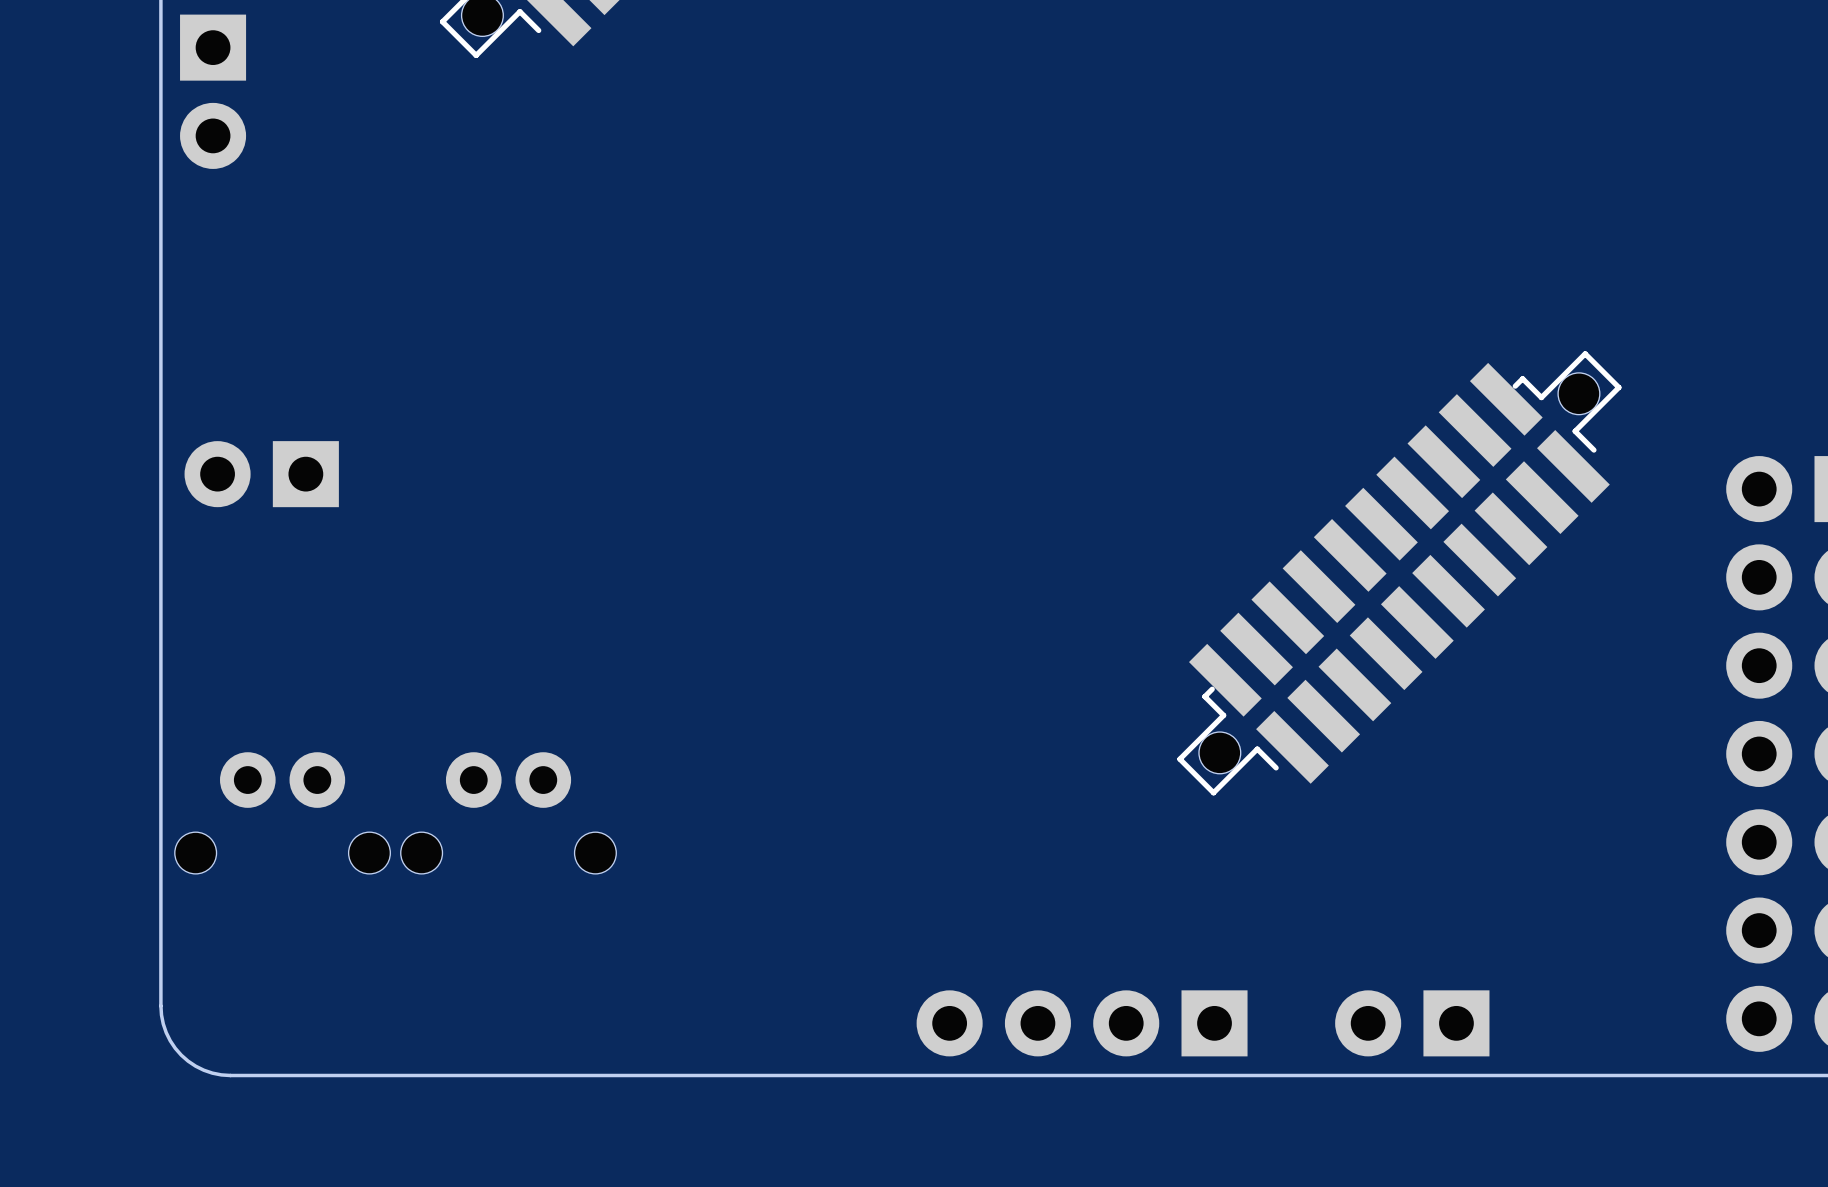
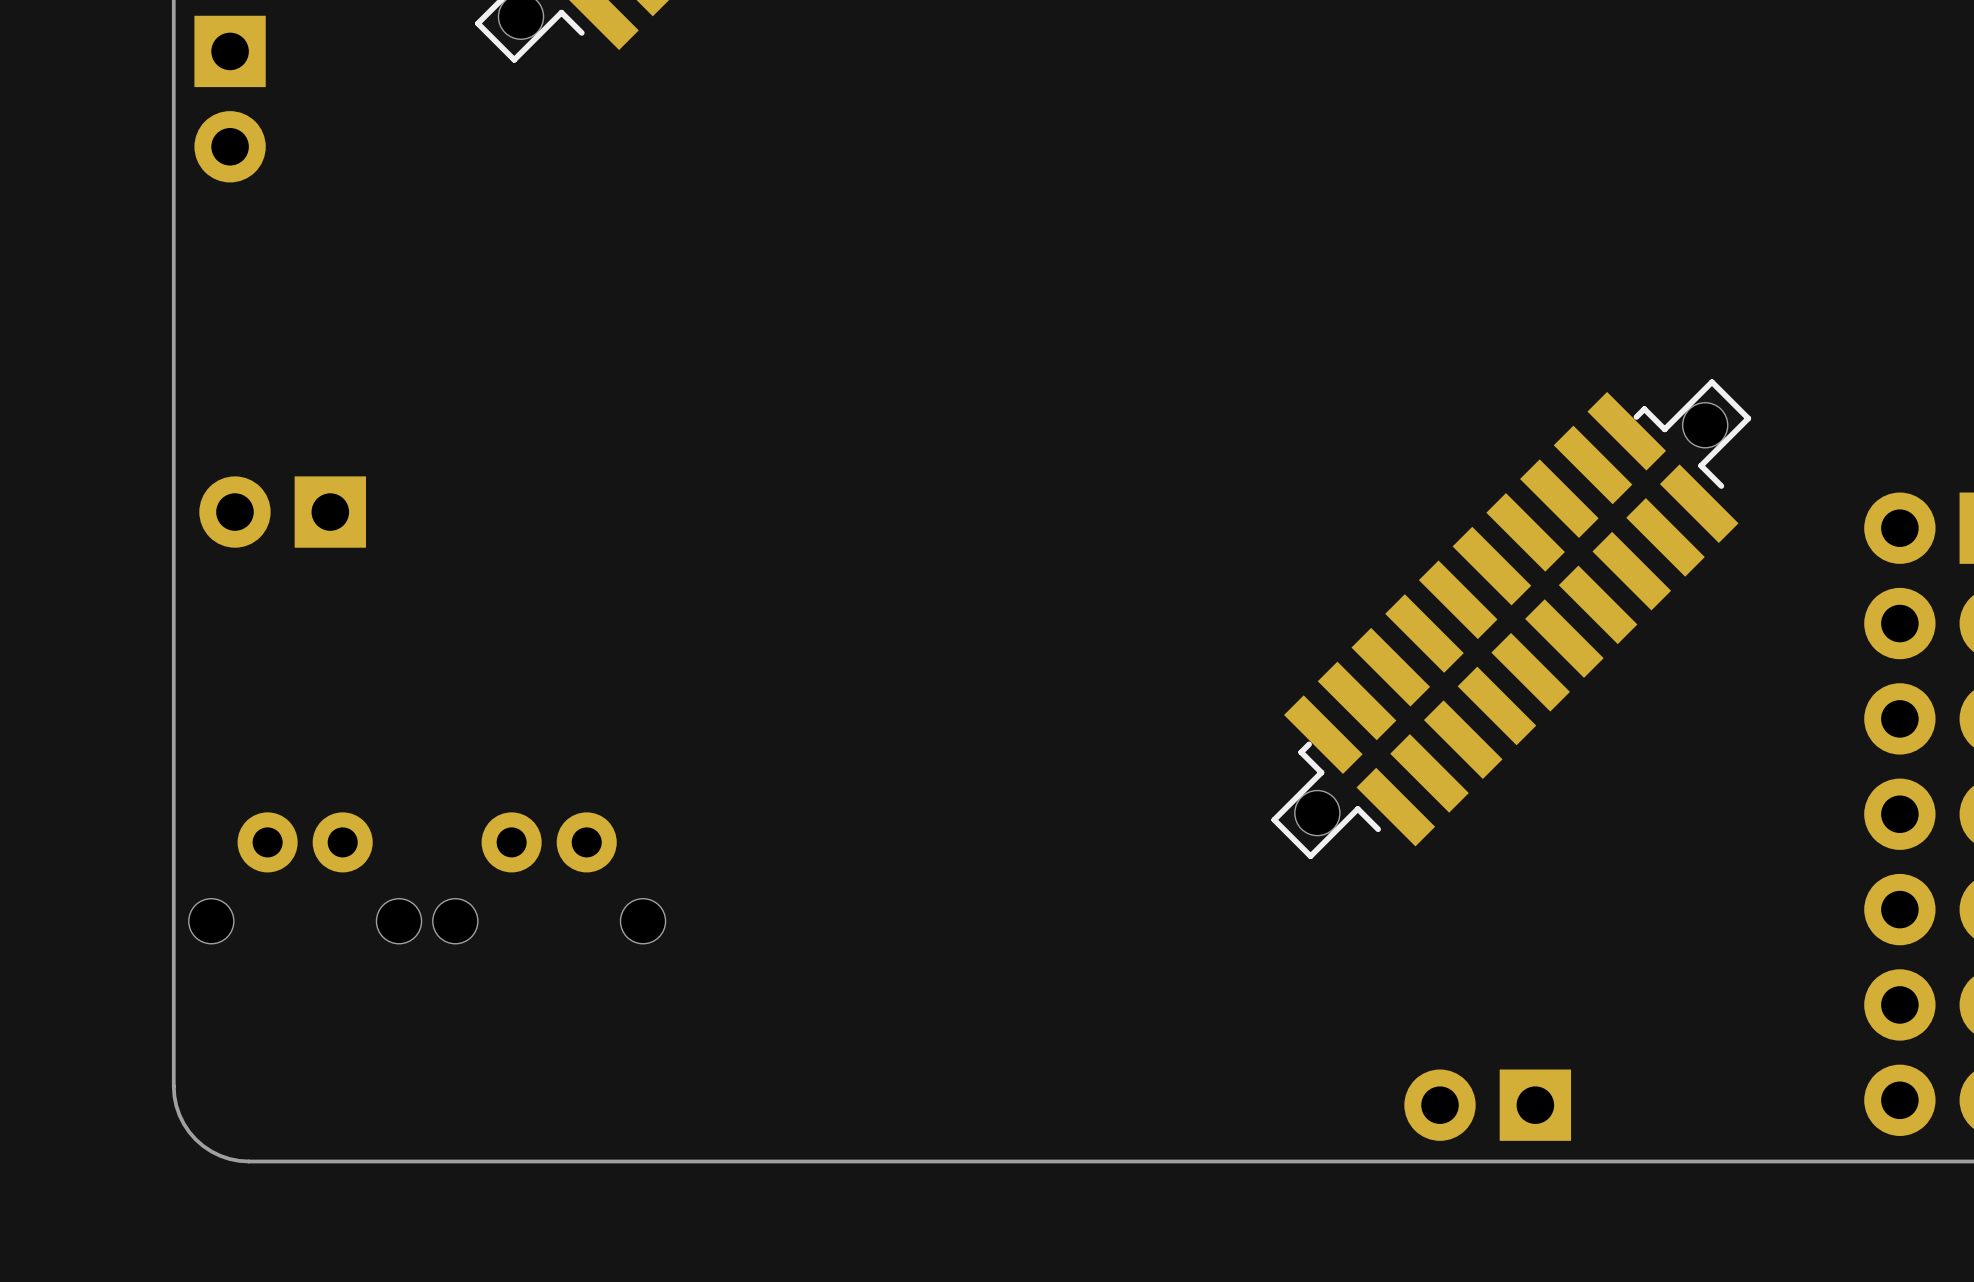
part: (1082, 1023) -> none
part position: (1412, 1023) -> (1487, 1105)

